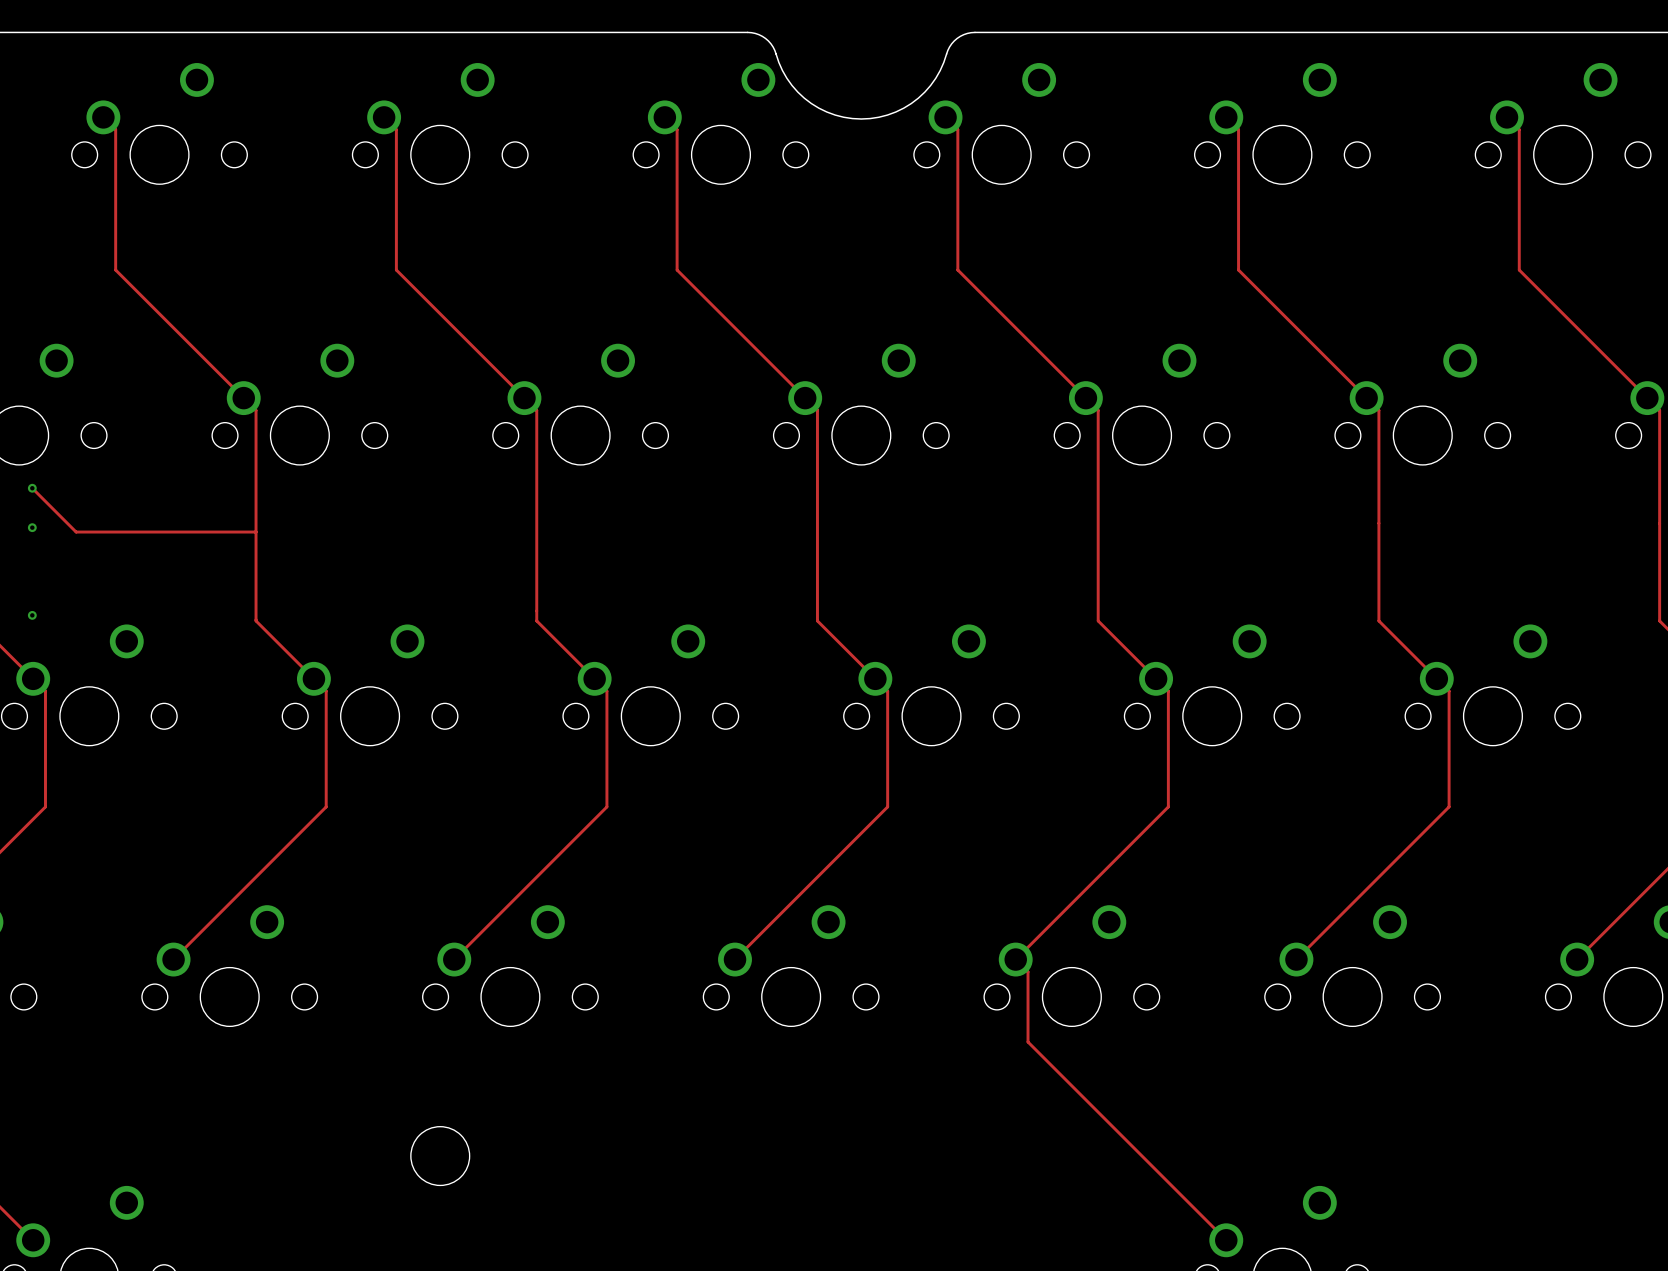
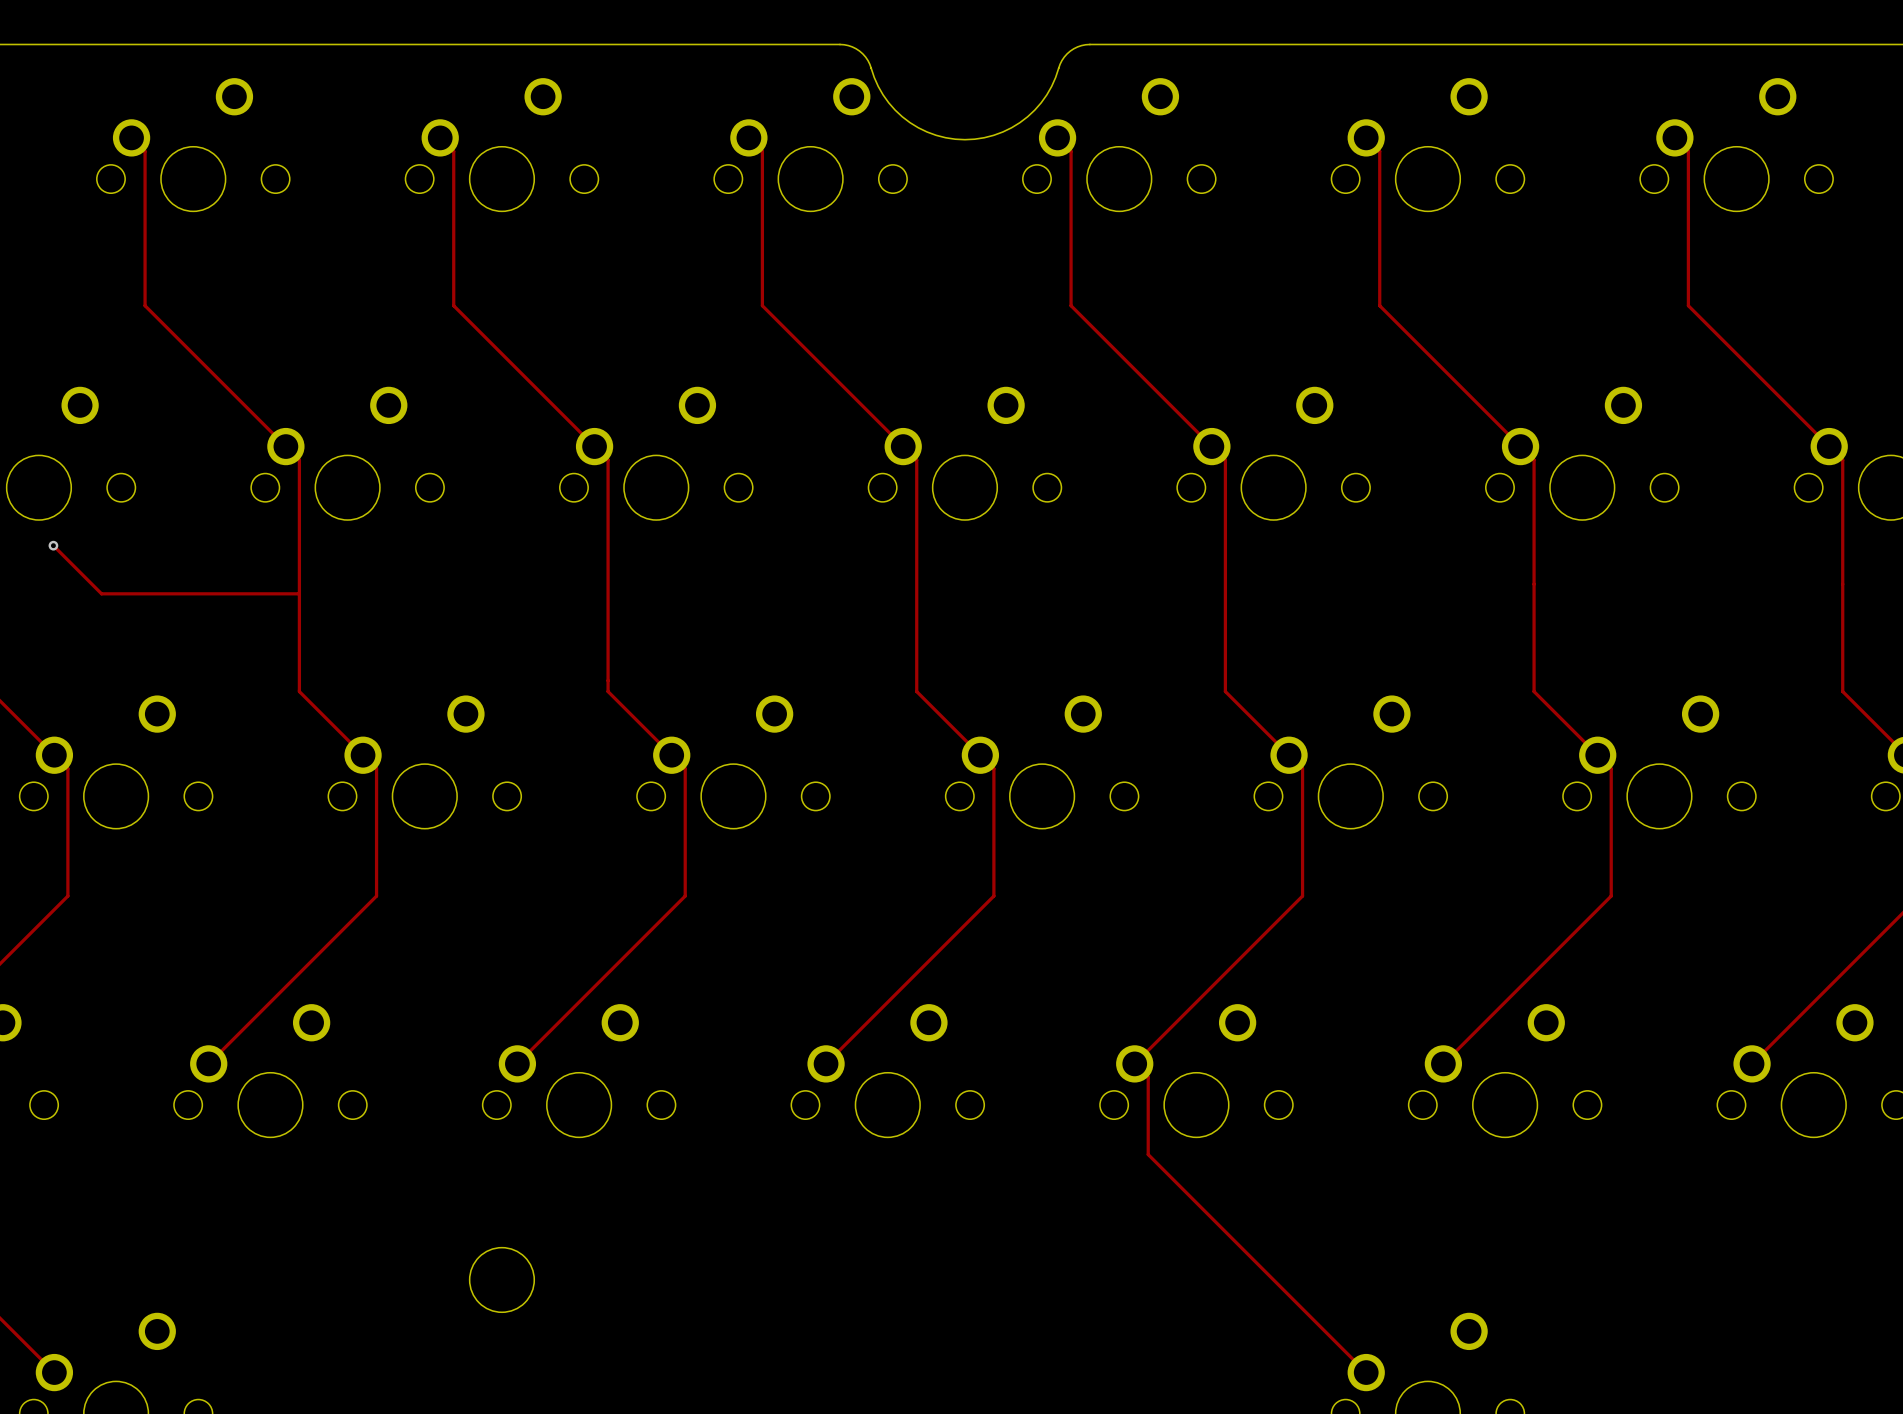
via: (32, 527) -> none
via: (32, 615) -> none

